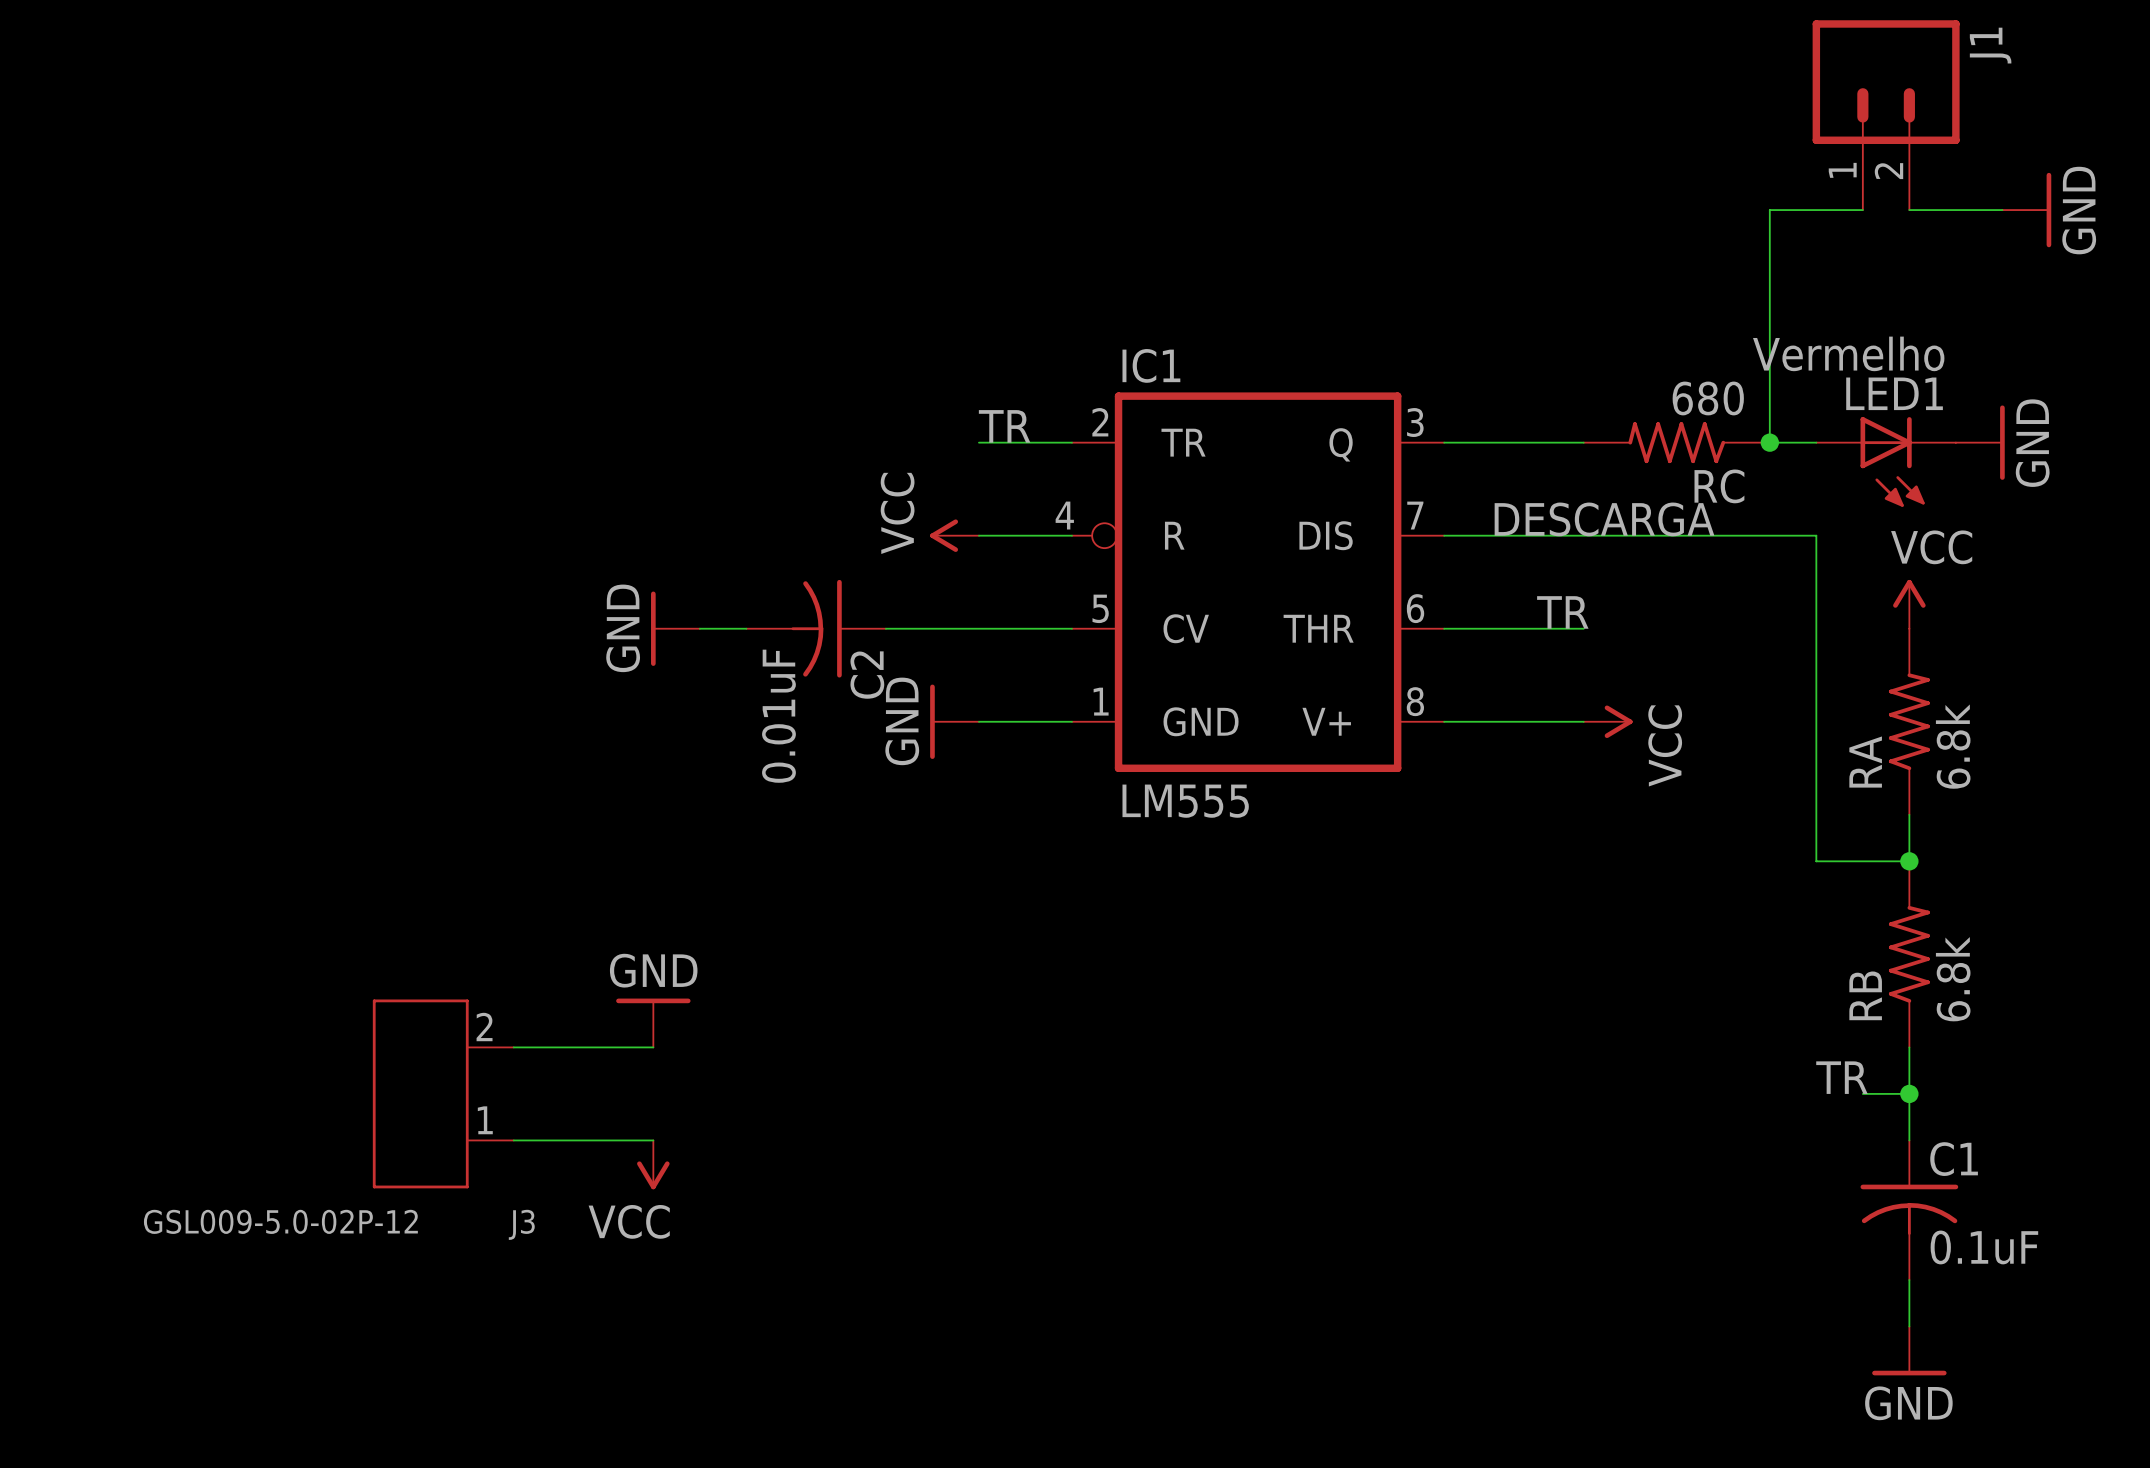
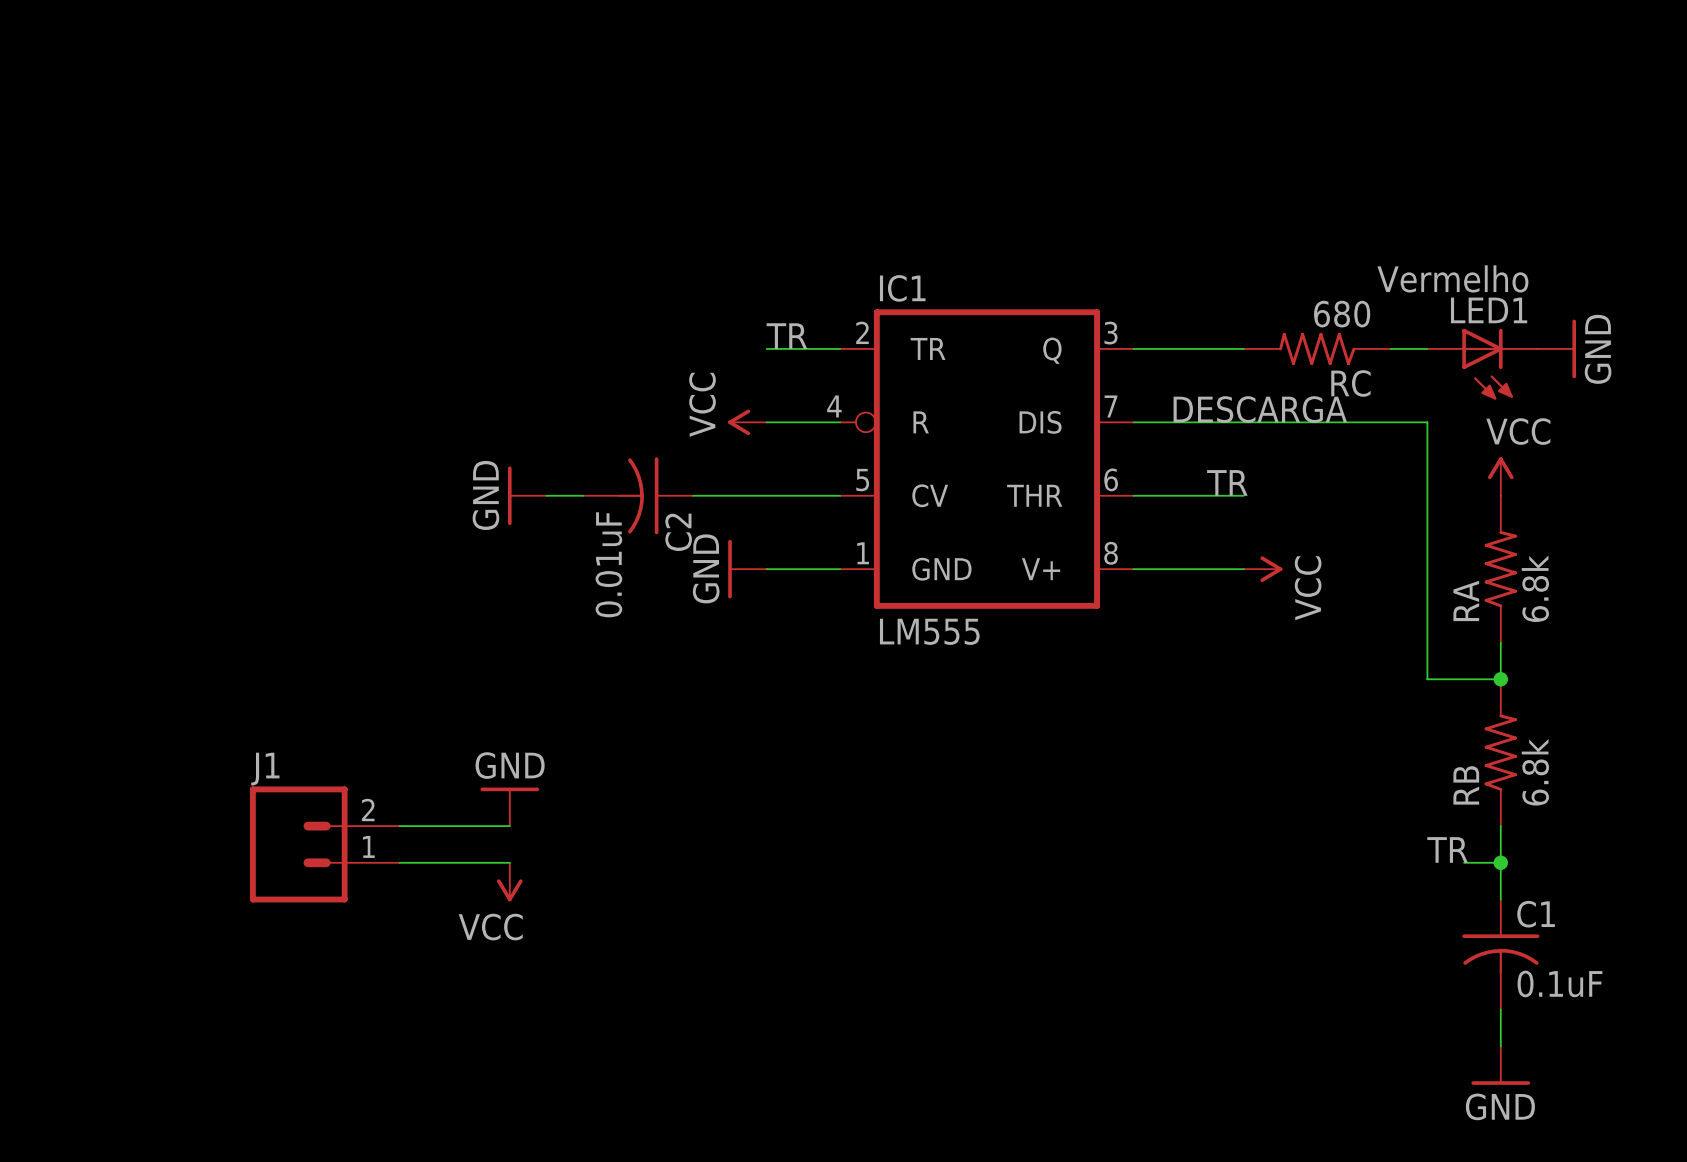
J1 rotation: 0° (1886, 82) -> 90° counterclockwise (298, 844)
J1 position: (1886, 115) -> (324, 844)
wire: (1862, 210) (1769, 210) (1769, 442) -> none
wire: (1909, 210) (2002, 210) -> none
power symbol: GND (2026, 210) -> none
junction: (1769, 442) -> none
J3: GSL009-5.0-02P-12 (443, 1093) -> none
wire: (513, 1140) (653, 1140) -> (399, 862) (509, 862)
power symbol position: VCC (653, 1164) -> VCC (509, 882)

